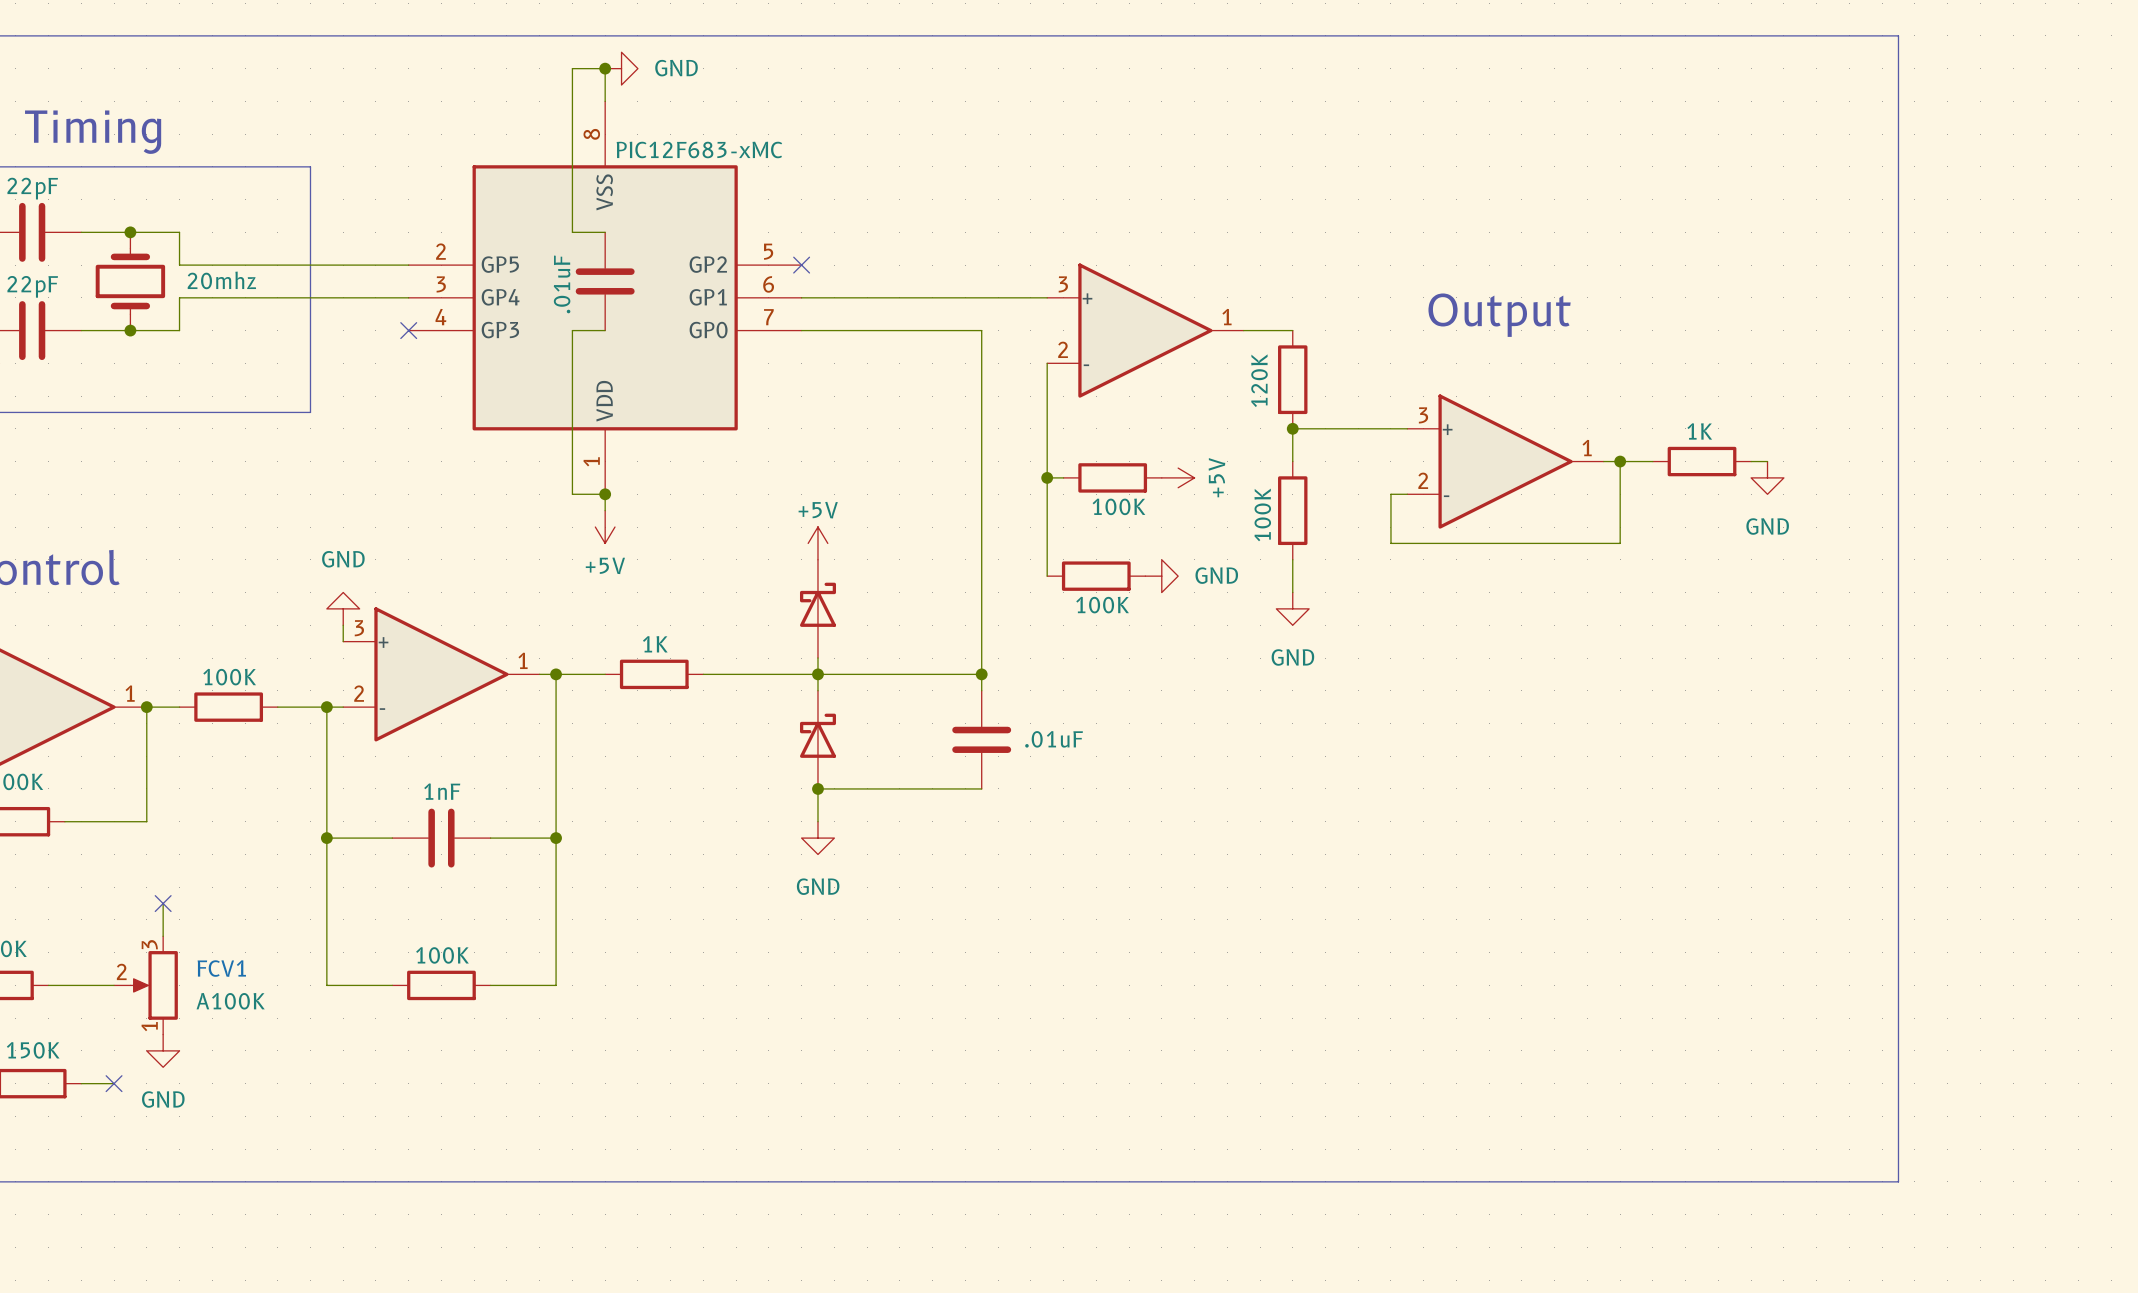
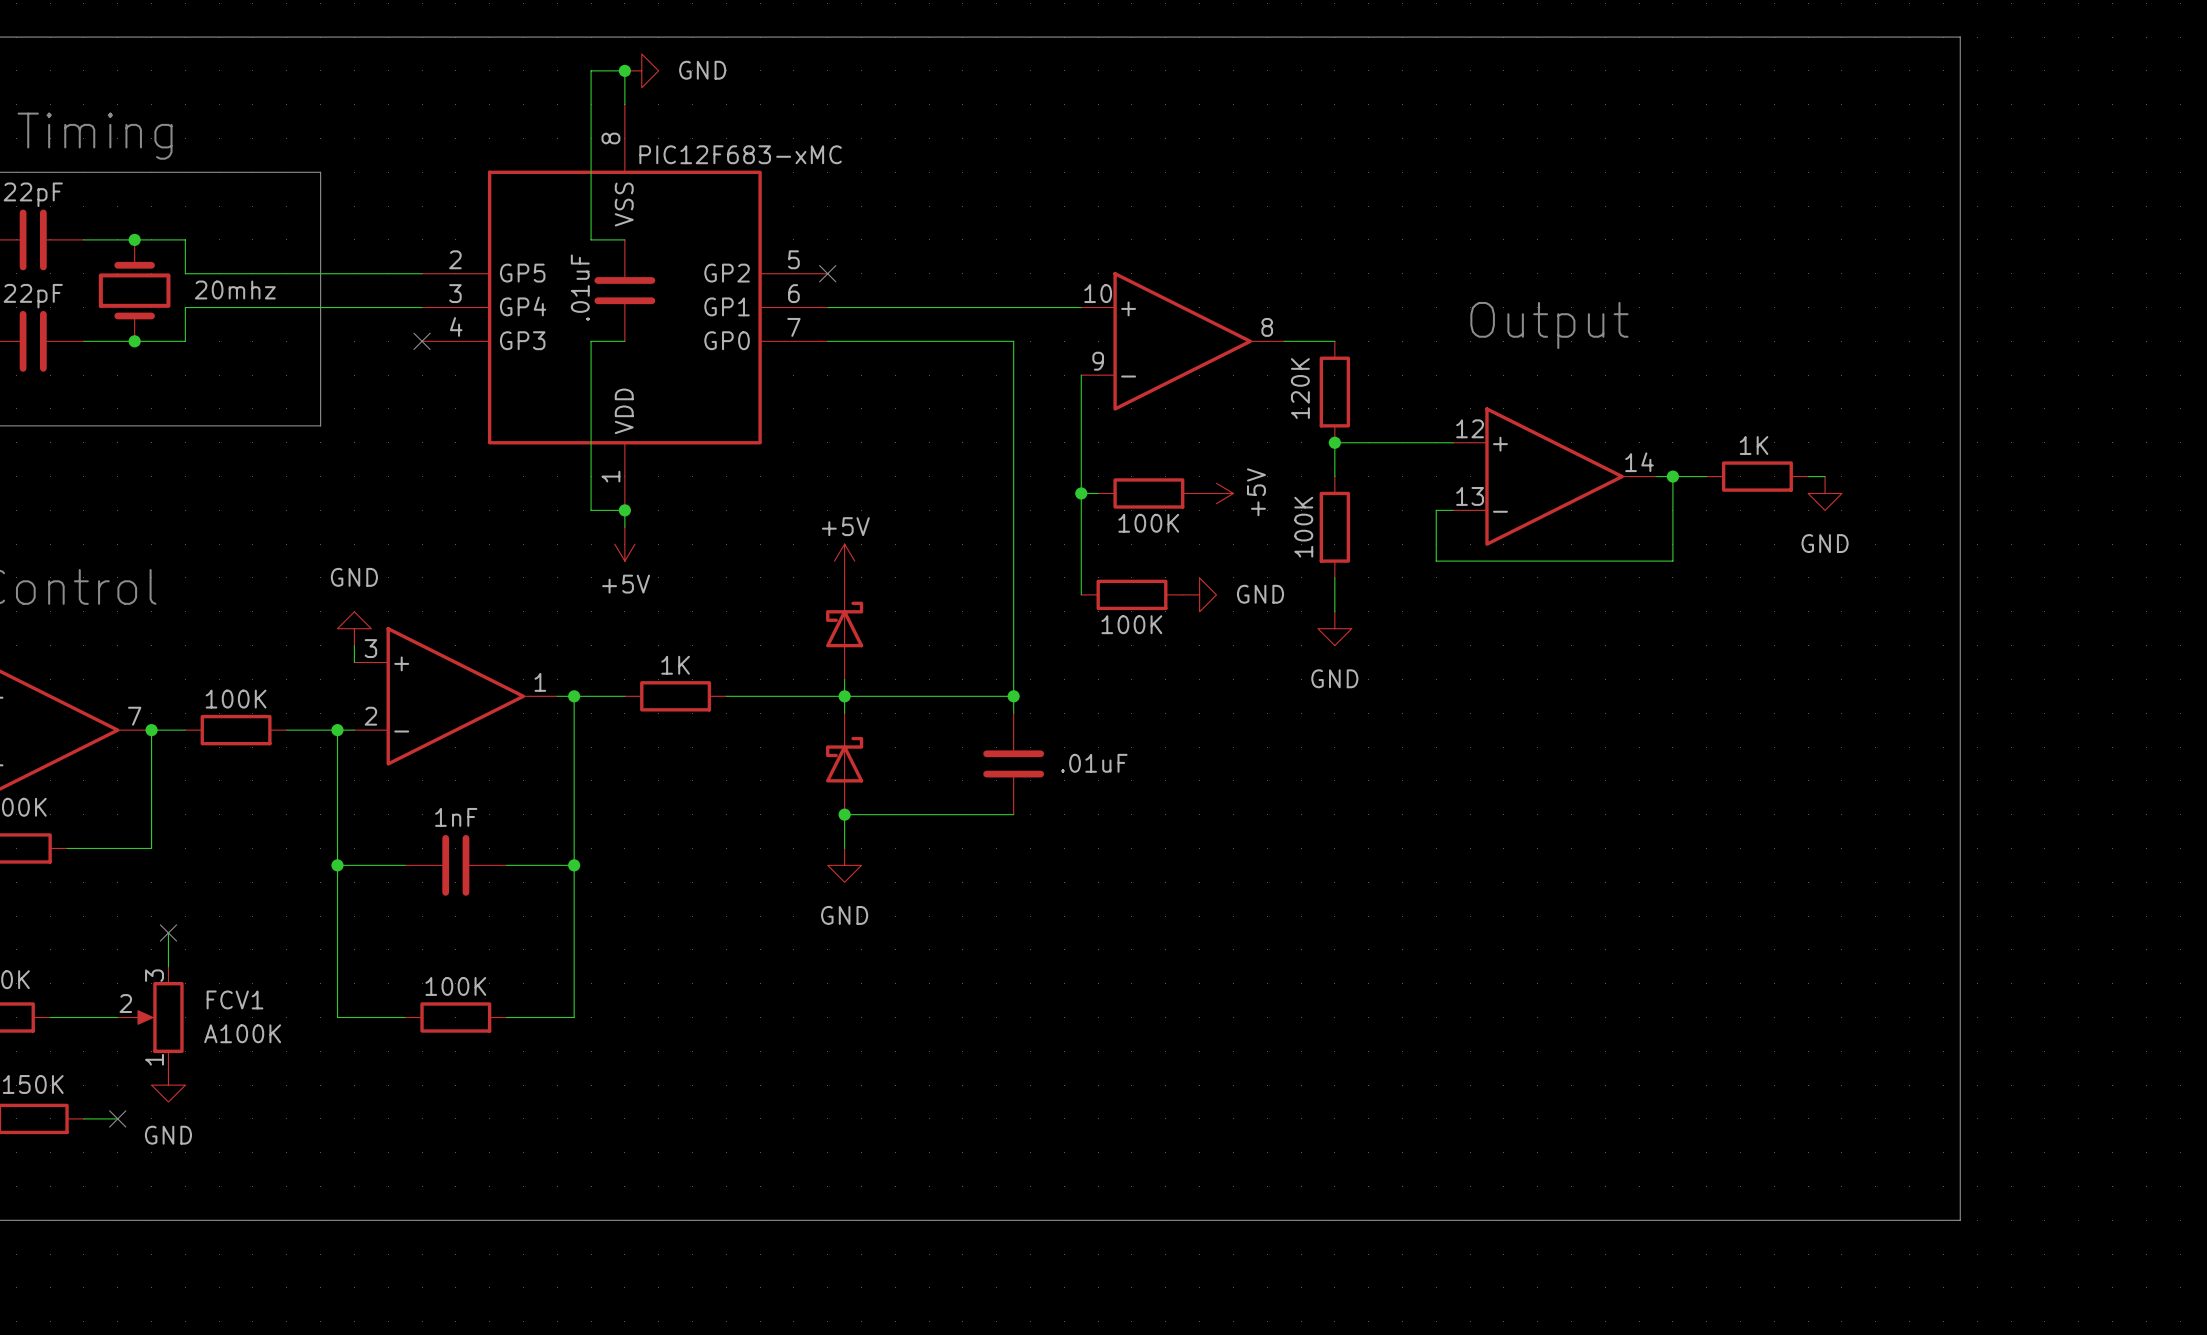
part pin number: 3 (1063, 284) -> 10 (1098, 293)
part pin number: 1 (1226, 317) -> 8 (1267, 327)
part pin number: 2 (1063, 349) -> 9 (1098, 361)
part pin number: 3 (1423, 415) -> 12 (1470, 428)
part pin number: 1 (1587, 448) -> 14 (1639, 462)
part pin number: 2 (1423, 480) -> 13 (1470, 496)
part pin number: 1 (130, 693) -> 7 (134, 716)

